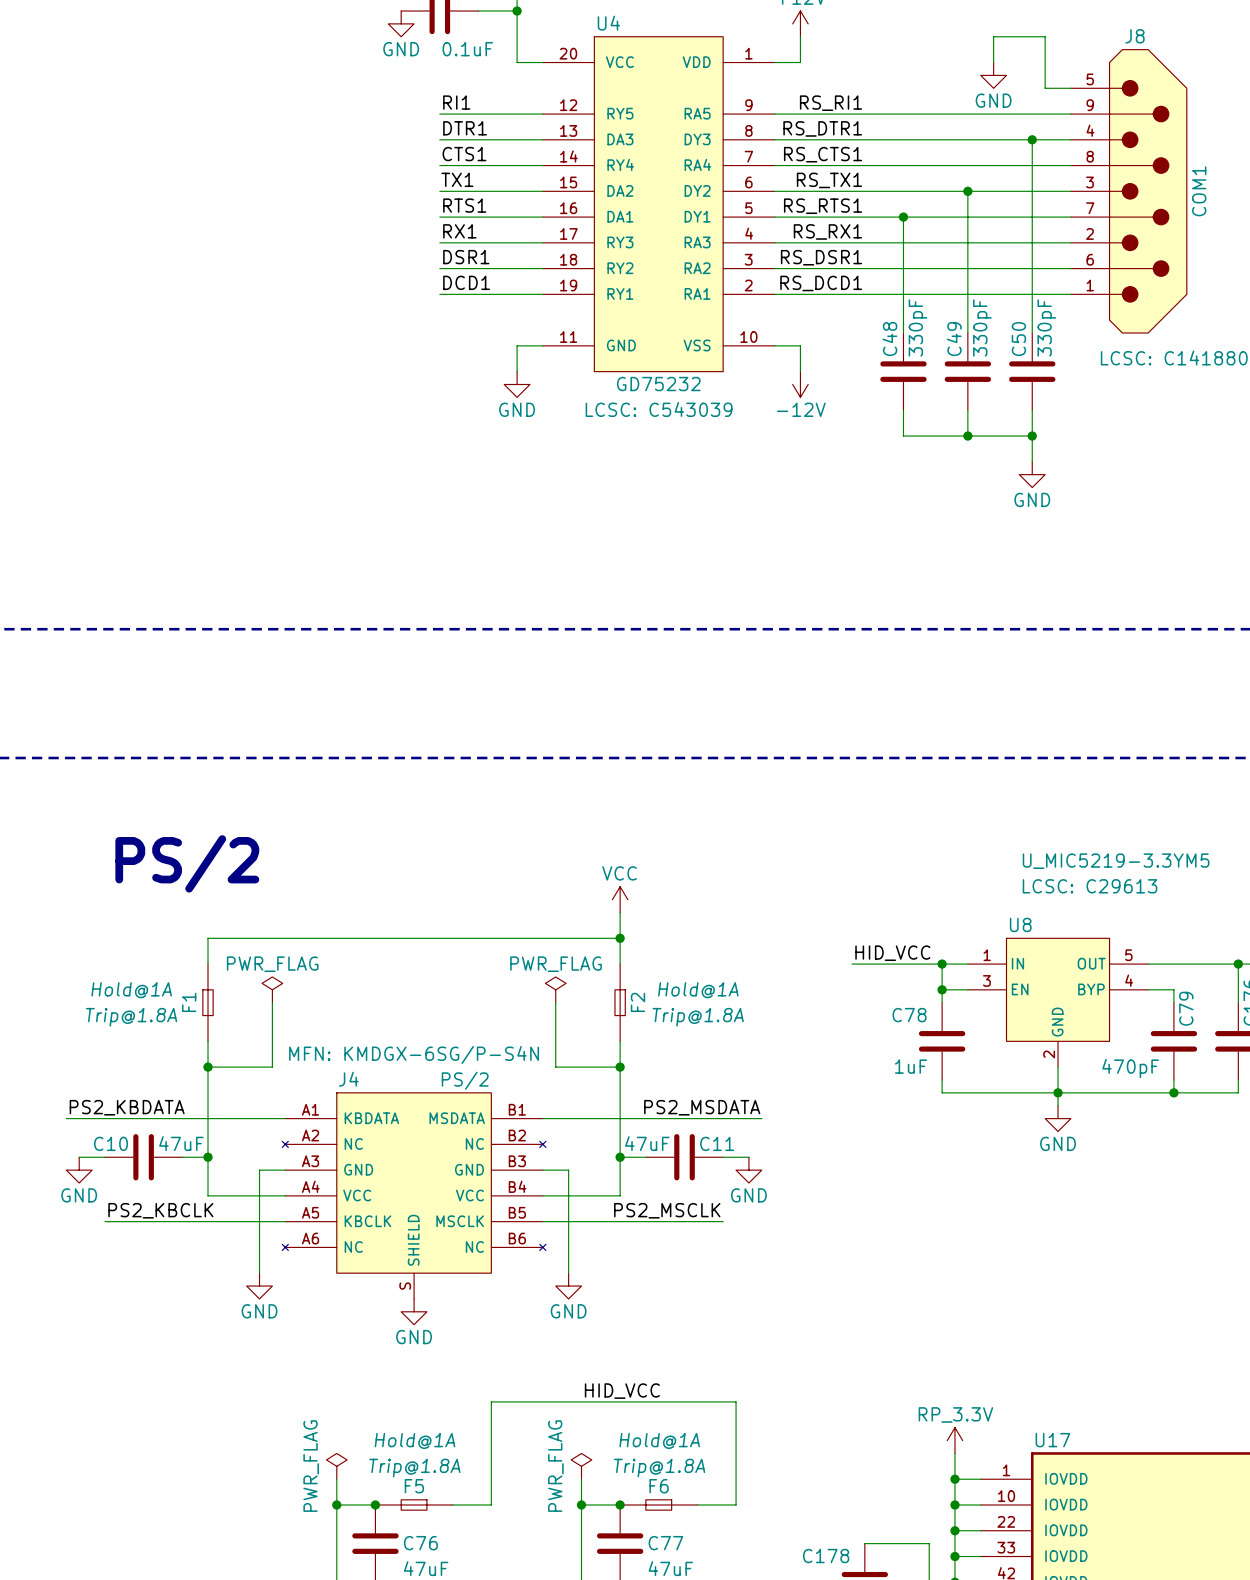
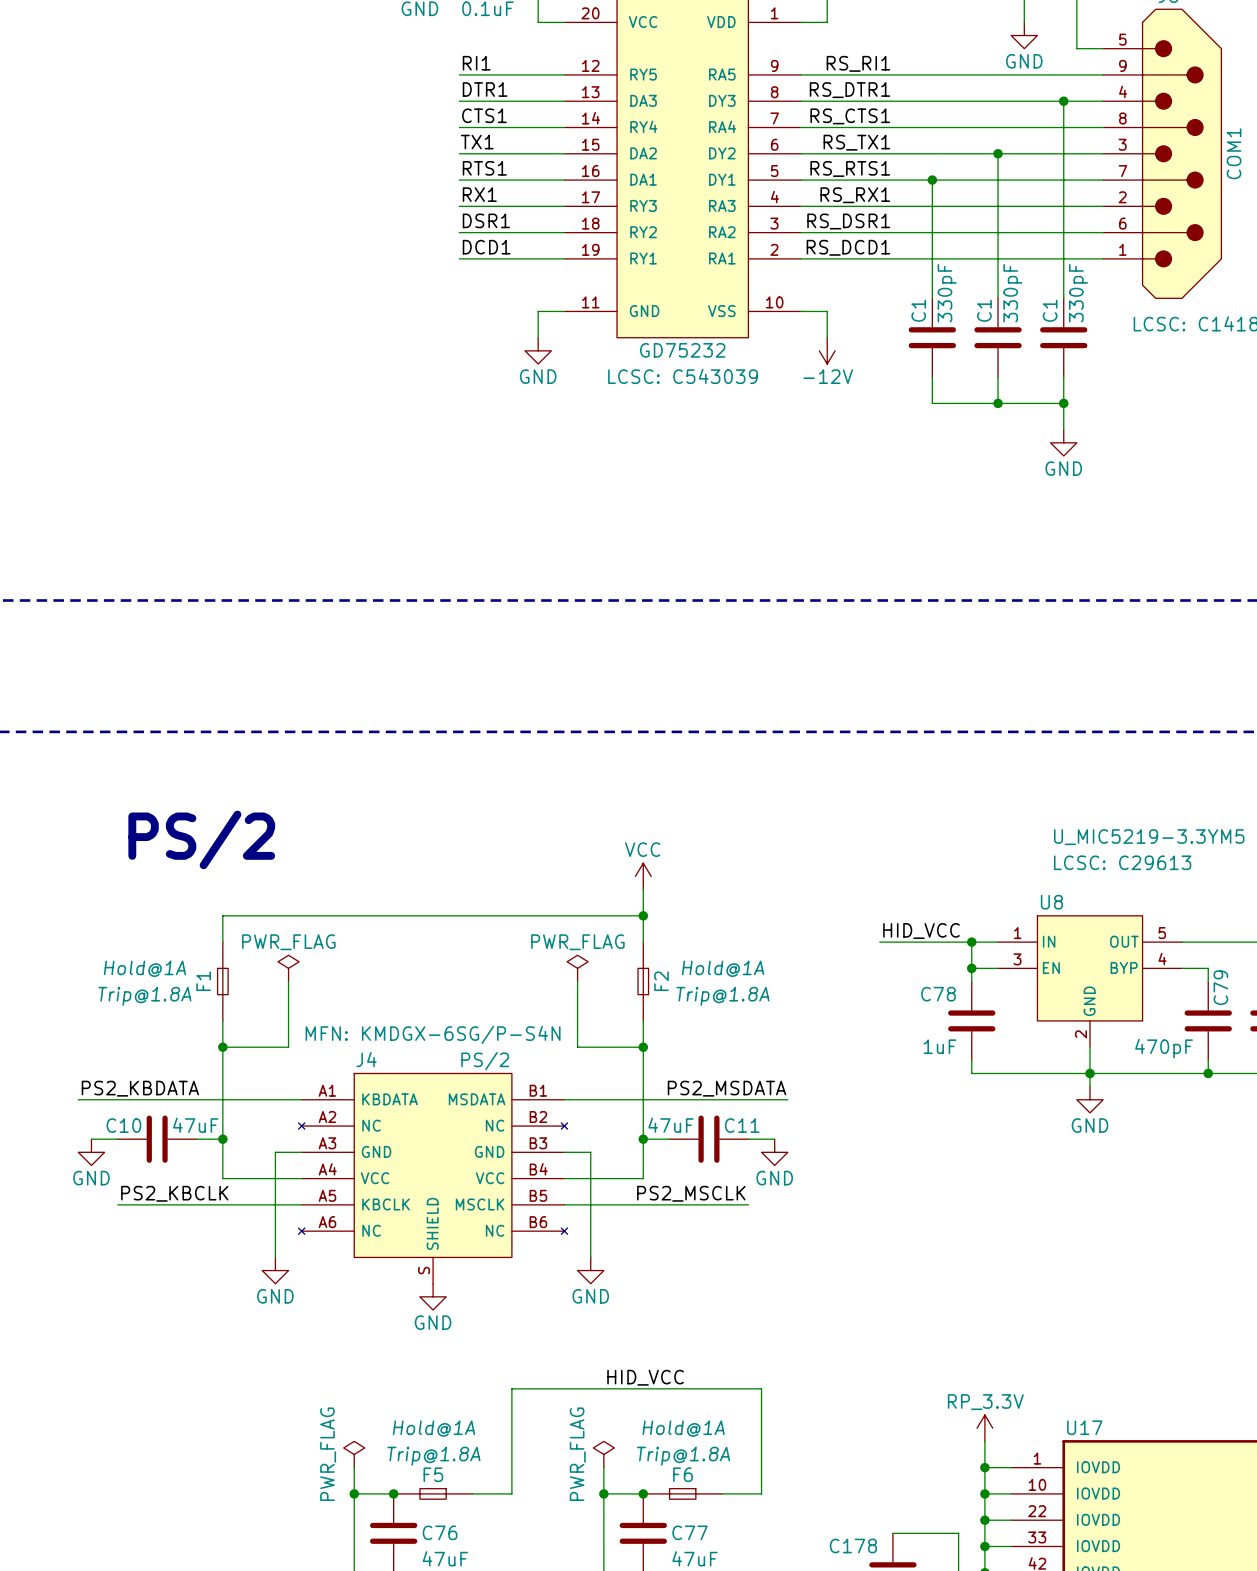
C48 name: C48 (889, 339) -> C1 (918, 310)
C49 name: C49 (954, 339) -> C1 (984, 310)
C50 name: C50 (1018, 339) -> C1 (1050, 310)

